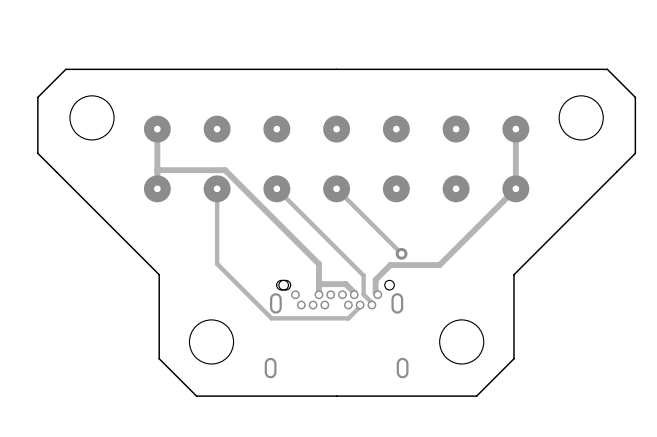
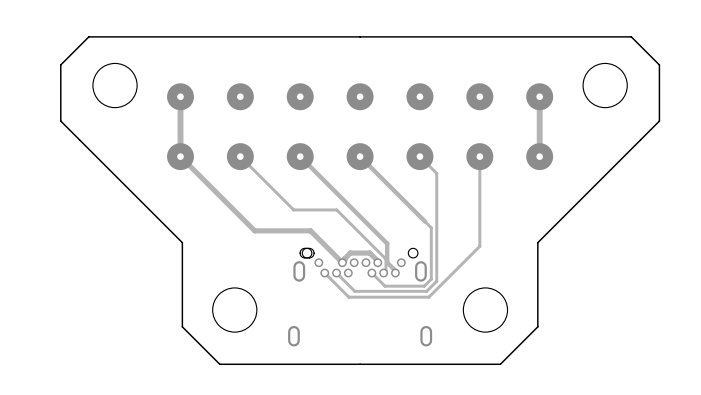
track: (157, 170) (225, 170) (318, 264) (318, 294) -> none
track: (217, 188) (217, 263) (271, 318) (348, 318) (360, 305) -> (240, 156) (293, 209) (336, 209) (385, 259) (385, 270) (383, 273)
track: none -> (419, 156) (436, 173) (436, 281) (426, 291) (354, 291) (336, 273)
track: none -> (479, 156) (479, 246) (428, 297) (348, 297) (324, 273)
track: (515, 188) (439, 265) (390, 265) (375, 279) (375, 292) (377, 294) -> none
track: none -> (425, 221) (431, 227) (431, 279) (424, 286) (385, 286) (371, 273)
via: (401, 253) -> none
track: (318, 284) (345, 284) (354, 293) -> (180, 156) (254, 230) (310, 230) (342, 262) (350, 253) (369, 253) (377, 261)

